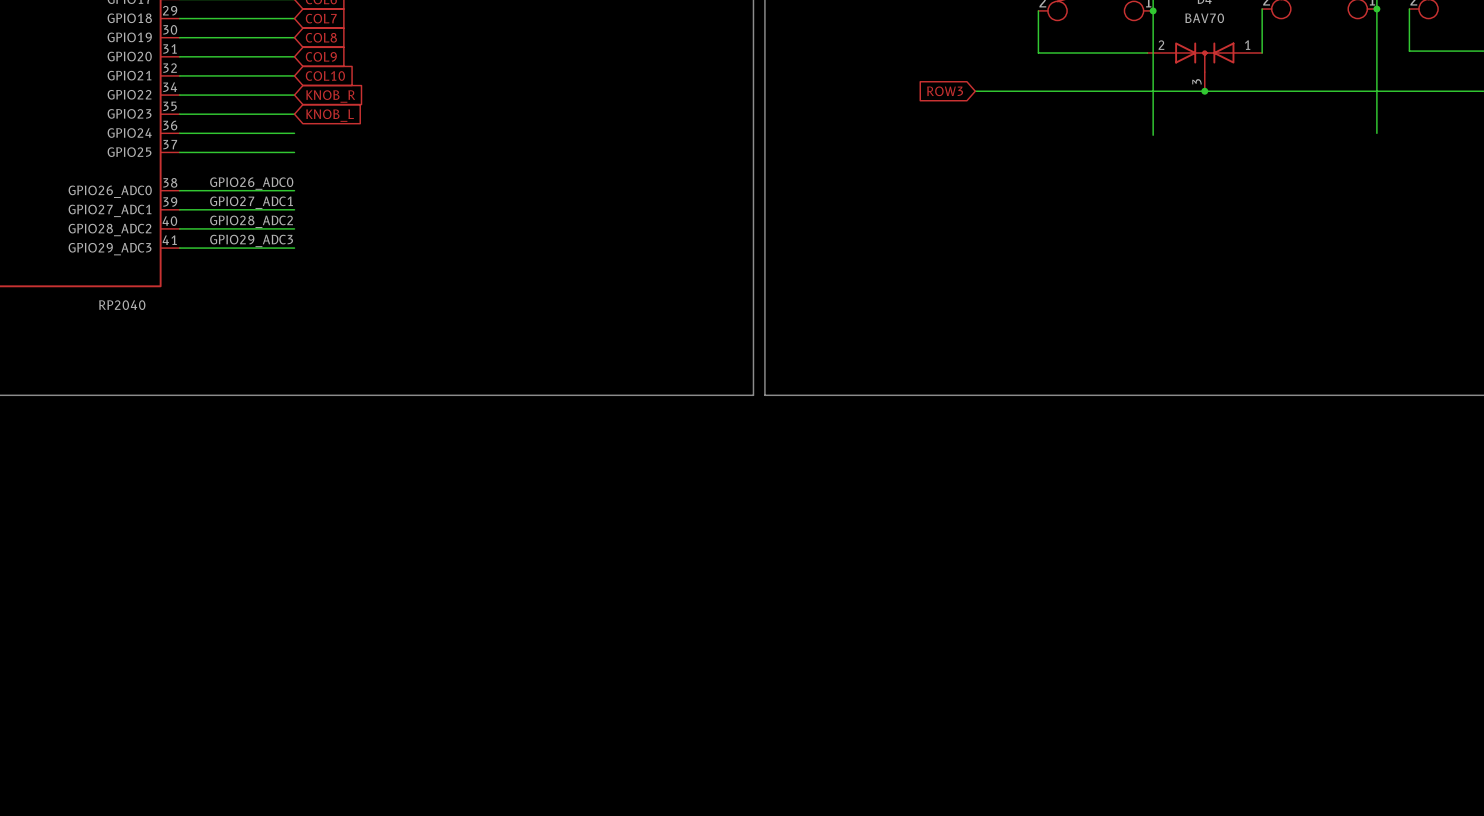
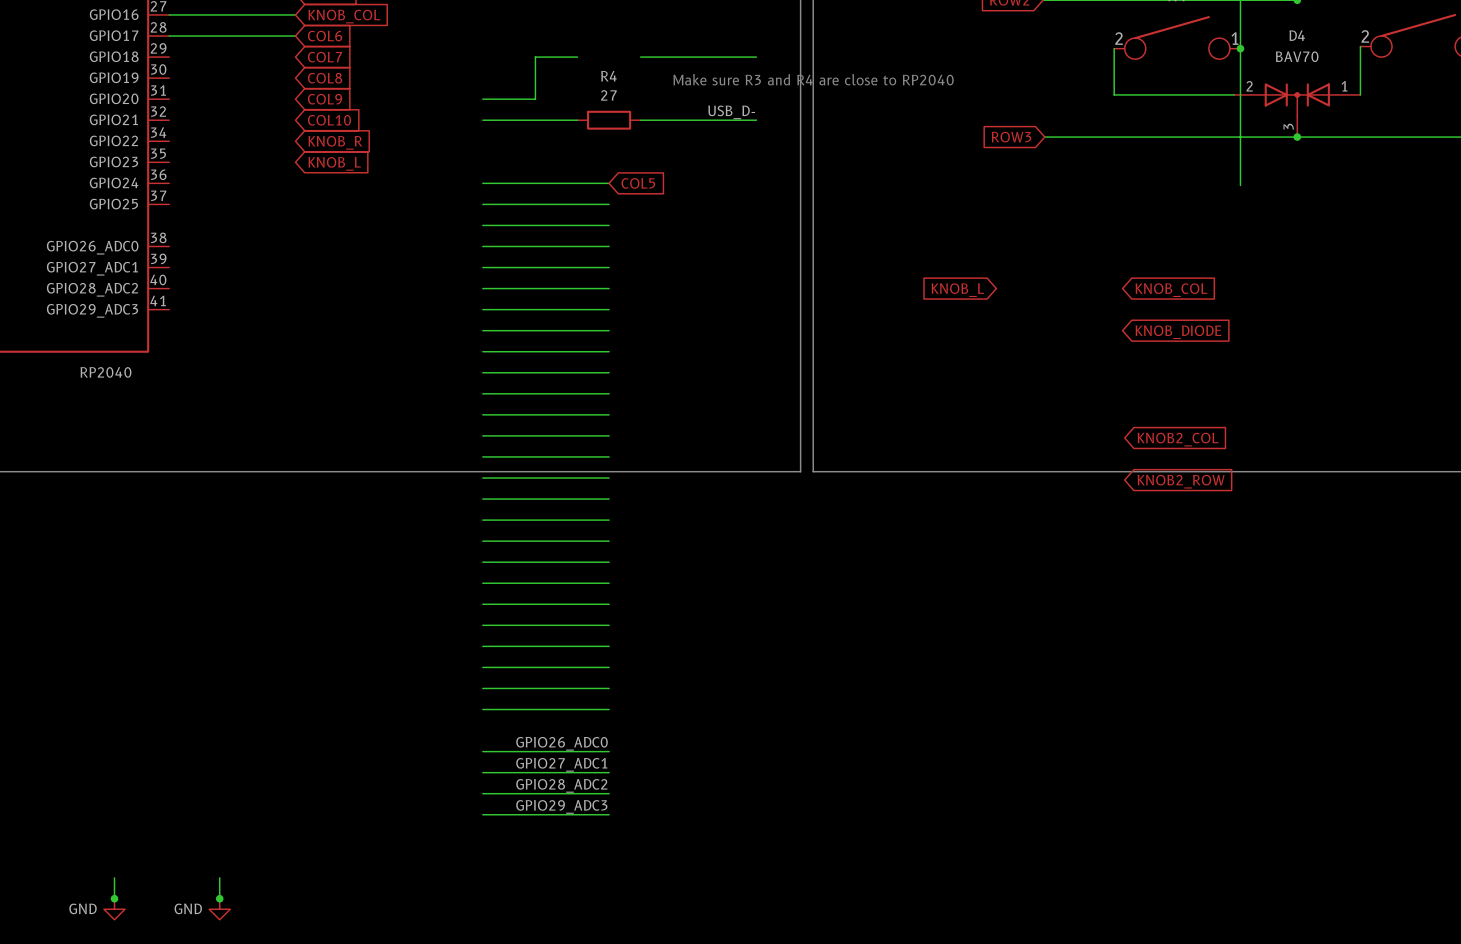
wire: (179, 18) (294, 18) -> none
wire: none -> (577, 57) (535, 57) (535, 99) (482, 99)
wire: none -> (640, 57) (756, 57)
wire: (179, 37) (294, 37) -> none
text: none -> Make sure R3 and R4 are close to RP2040 (813, 79)
wire: (179, 56) (294, 56) -> none
label: none -> USB_D- (731, 112)
wire: (179, 75) (294, 75) -> none
wire: none -> (482, 120) (577, 120)
R4: none -> 27 (609, 120)
wire: none -> (640, 120) (756, 120)
wire: (179, 95) (294, 95) -> none
wire: (179, 114) (294, 114) -> none
wire: (179, 133) (294, 133) -> none
wire: none -> (482, 183) (609, 183)
global label: none -> COL5 (638, 183)
wire: (179, 152) (294, 152) -> none
wire: none -> (482, 204) (609, 204)
wire: none -> (482, 225) (609, 225)
label: GPIO26_ADC0 (251, 183) -> none
wire: (179, 190) (294, 190) -> none
wire: none -> (482, 246) (609, 246)
label: GPIO27_ADC1 (251, 202) -> none
wire: (179, 209) (294, 209) -> none
wire: none -> (482, 267) (609, 267)
label: GPIO28_ADC2 (251, 221) -> none
wire: (179, 228) (294, 228) -> none
wire: none -> (482, 288) (609, 288)
global label: none -> KNOB_L (957, 290)
global label: none -> KNOB_COL (1171, 290)
label: GPIO29_ADC3 (251, 240) -> none
wire: (179, 248) (294, 248) -> none
wire: none -> (482, 309) (609, 309)
wire: none -> (482, 330) (609, 330)
global label: none -> KNOB_DIODE (1178, 332)
wire: none -> (482, 351) (609, 351)
wire: none -> (482, 372) (609, 372)
wire: none -> (482, 393) (609, 393)
wire: none -> (482, 414) (609, 414)
wire: none -> (482, 435) (609, 435)
global label: none -> KNOB2_COL (1178, 439)
wire: none -> (482, 456) (609, 456)
wire: none -> (482, 478) (609, 478)
global label: none -> KNOB2_ROW (1181, 481)
wire: none -> (482, 499) (609, 499)
wire: none -> (482, 520) (609, 520)
wire: none -> (482, 541) (609, 541)
wire: none -> (482, 562) (609, 562)
wire: none -> (482, 583) (609, 583)
wire: none -> (482, 604) (609, 604)
wire: none -> (482, 625) (609, 625)
wire: none -> (482, 646) (609, 646)
wire: none -> (482, 667) (609, 667)
wire: none -> (482, 688) (609, 688)
wire: none -> (482, 709) (609, 709)
label: none -> GPIO26_ADC0 (562, 743)
wire: none -> (482, 751) (609, 751)
label: none -> GPIO27_ADC1 (561, 764)
wire: none -> (482, 772) (609, 772)
label: none -> GPIO28_ADC2 (561, 785)
wire: none -> (482, 793) (609, 793)
label: none -> GPIO29_ADC3 (561, 806)
wire: none -> (482, 814) (609, 814)
wire: none -> (114, 877) (114, 898)
wire: none -> (219, 877) (219, 898)
junction: none -> (114, 898)
junction: none -> (219, 898)
power symbol: none -> GND (114, 909)
power symbol: none -> GND (219, 909)

